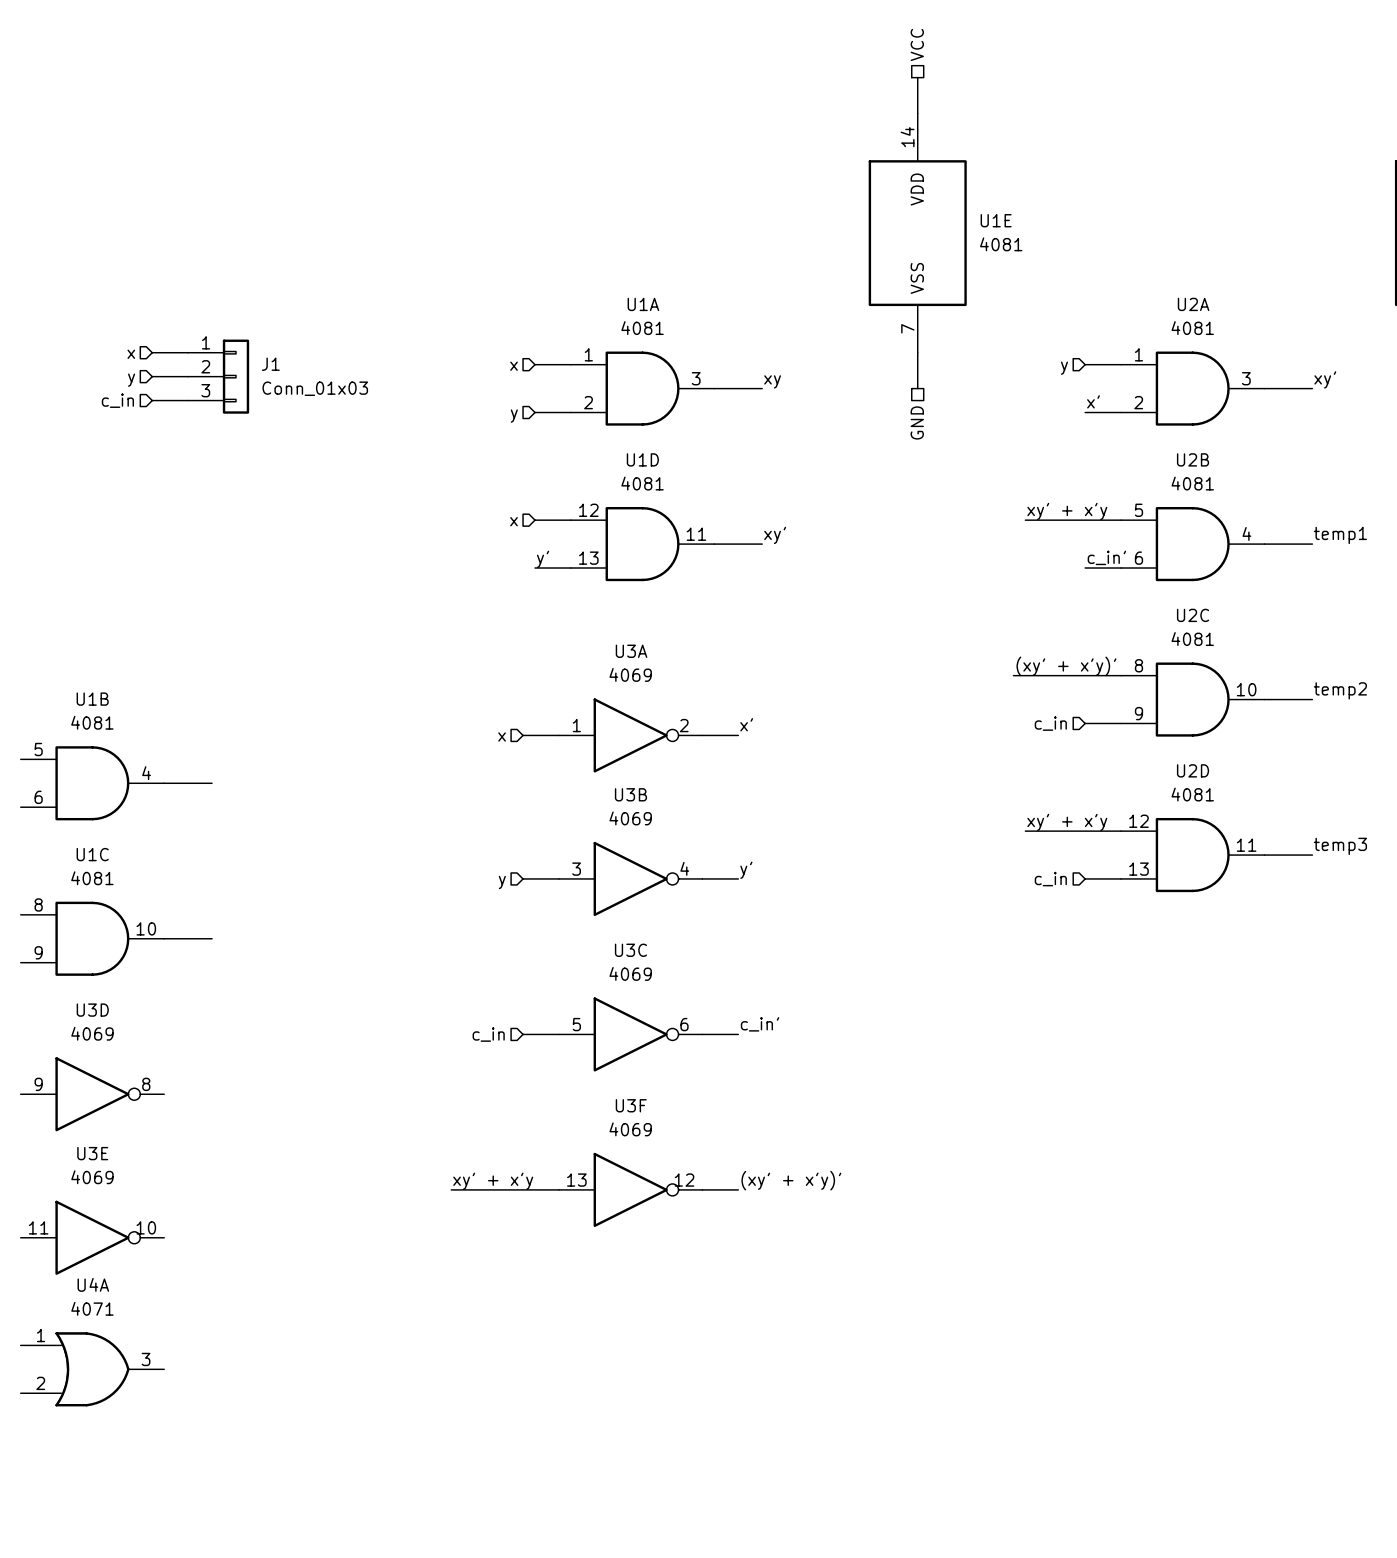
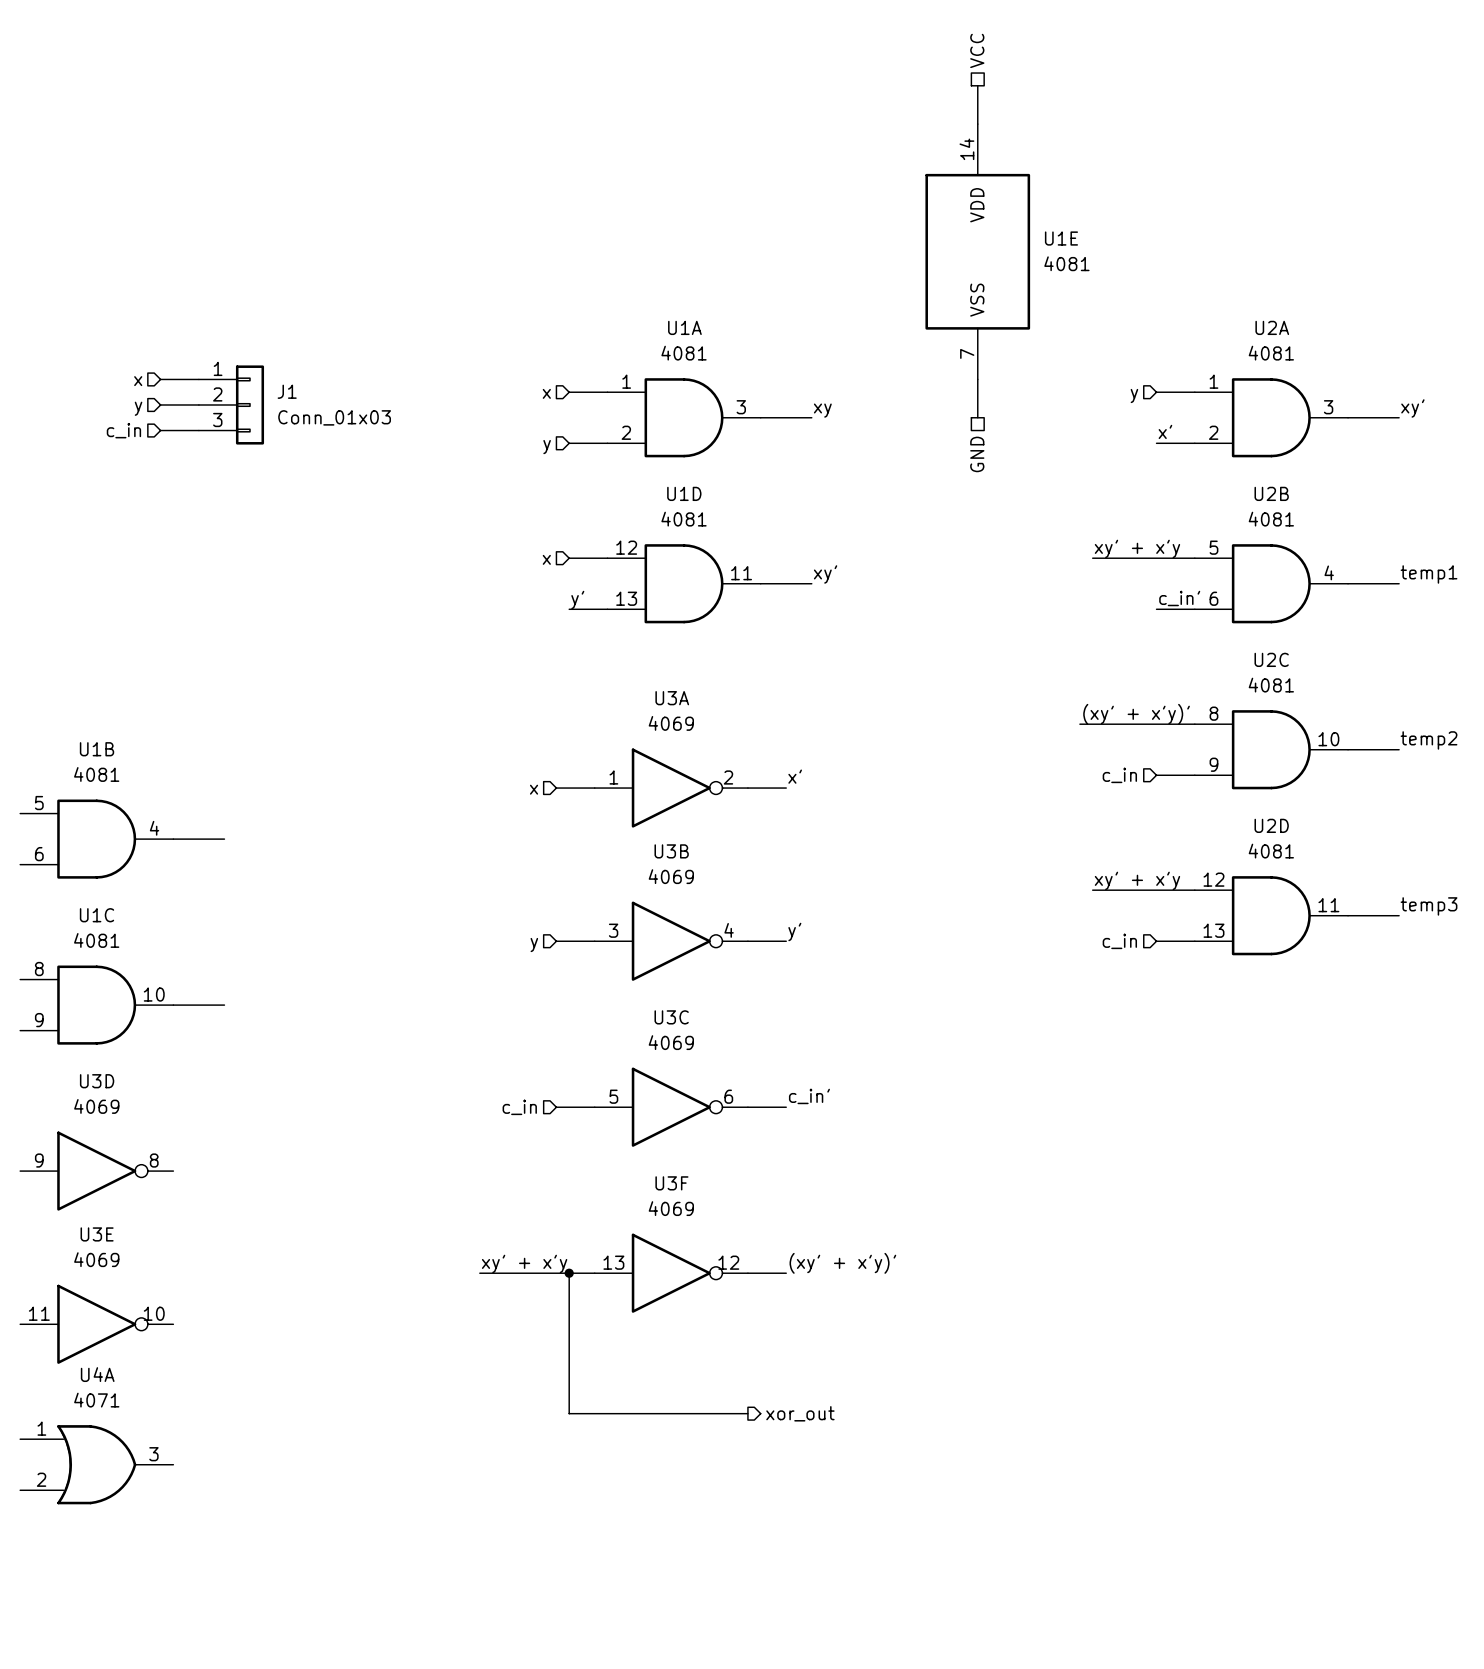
wire: none -> (569, 1273) (569, 1413) (747, 1413)
junction: none -> (569, 1273)
hierarchical label: none -> xor_out (800, 1413)

